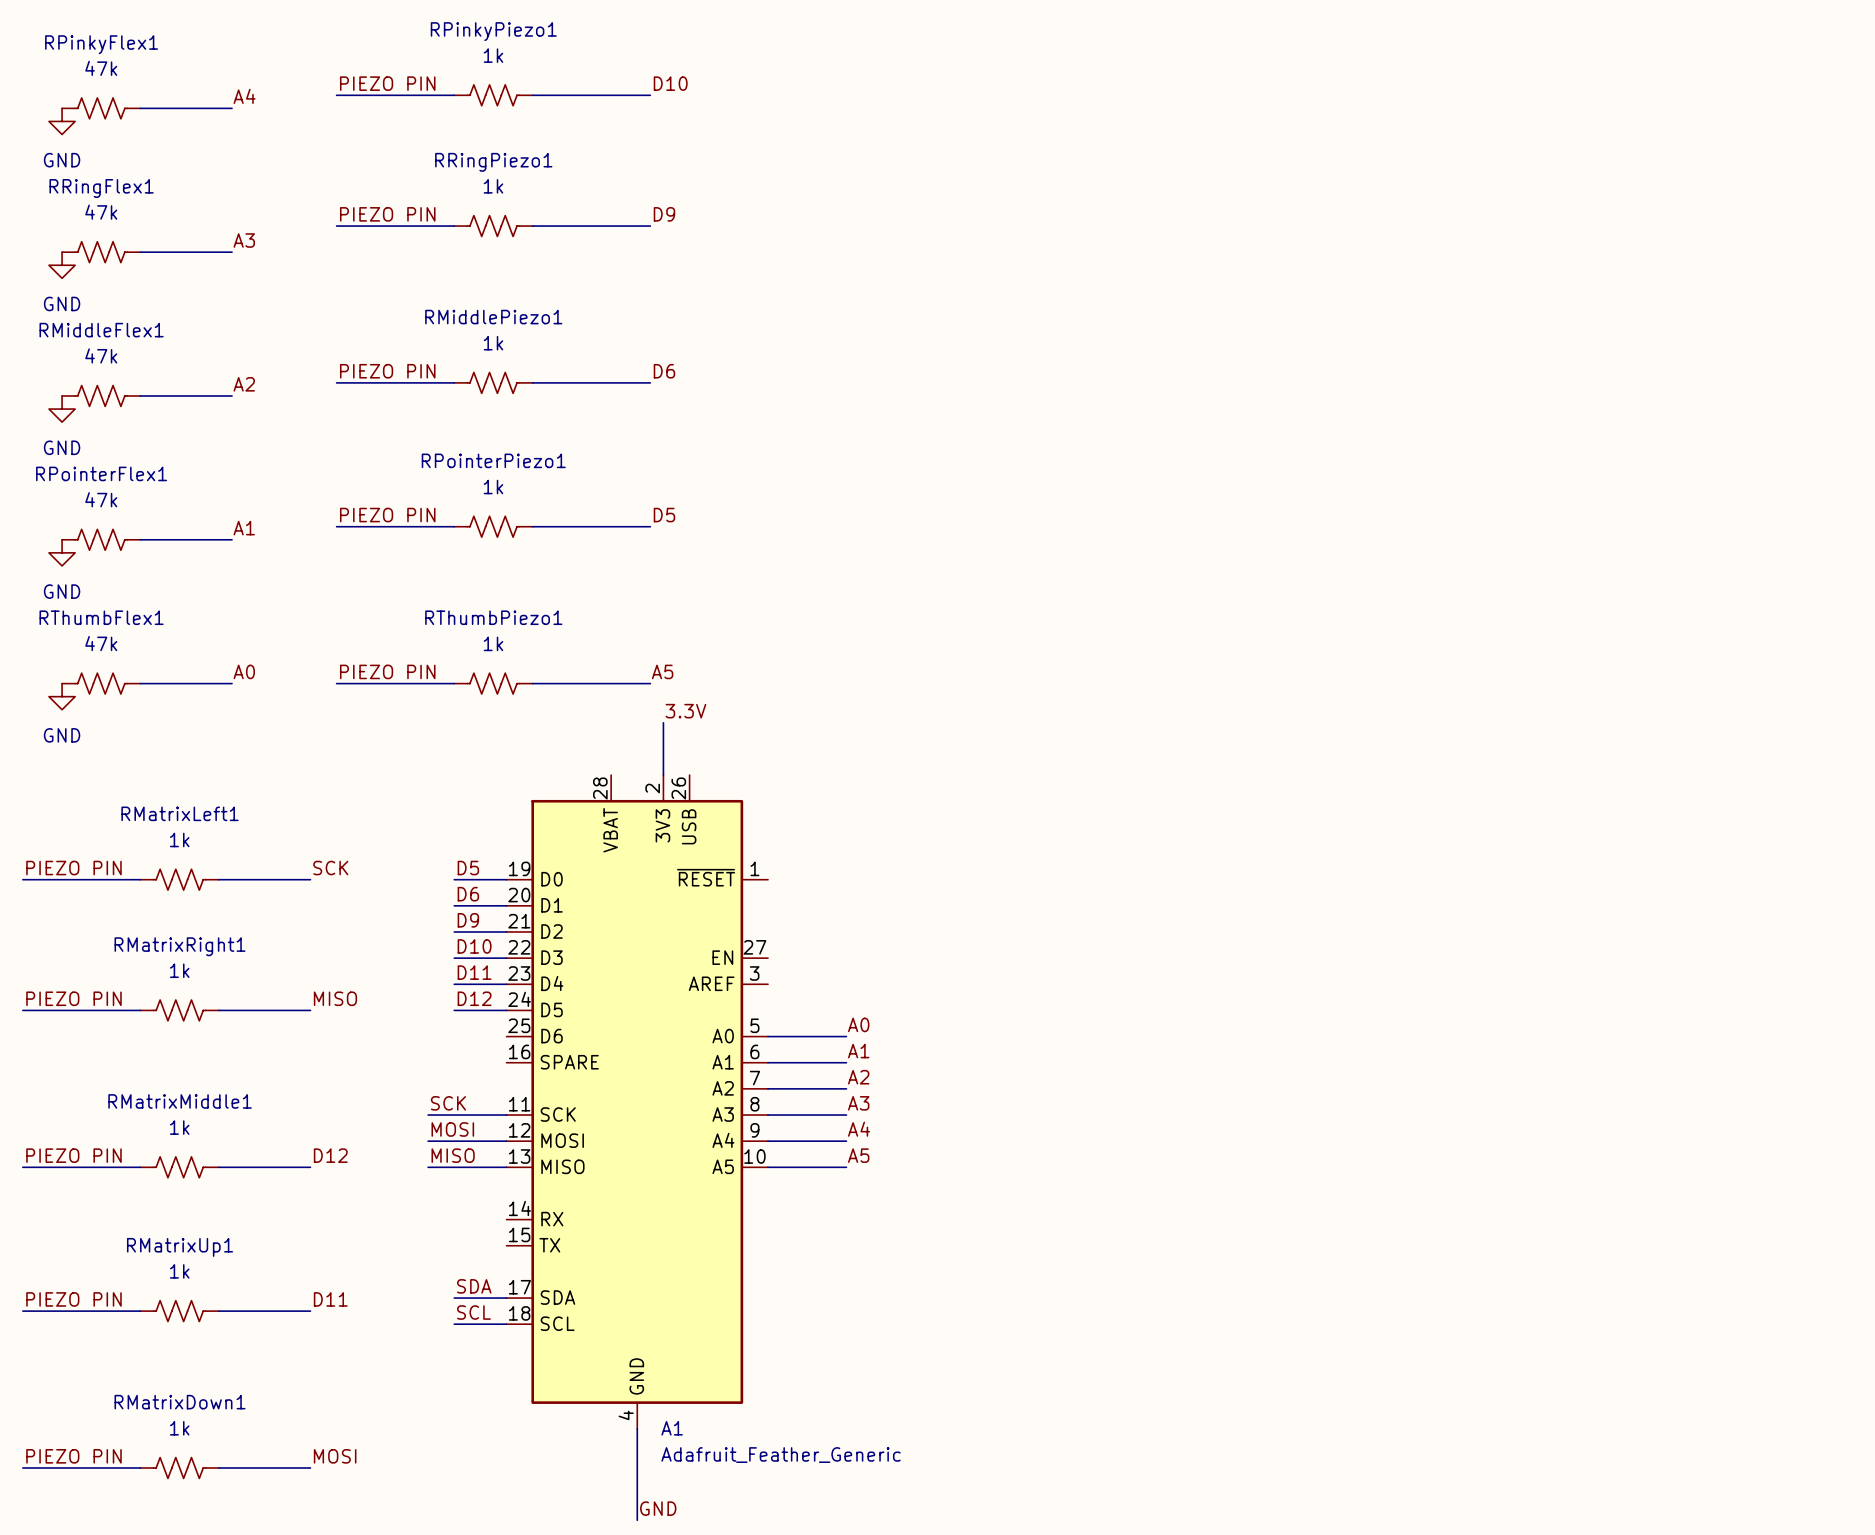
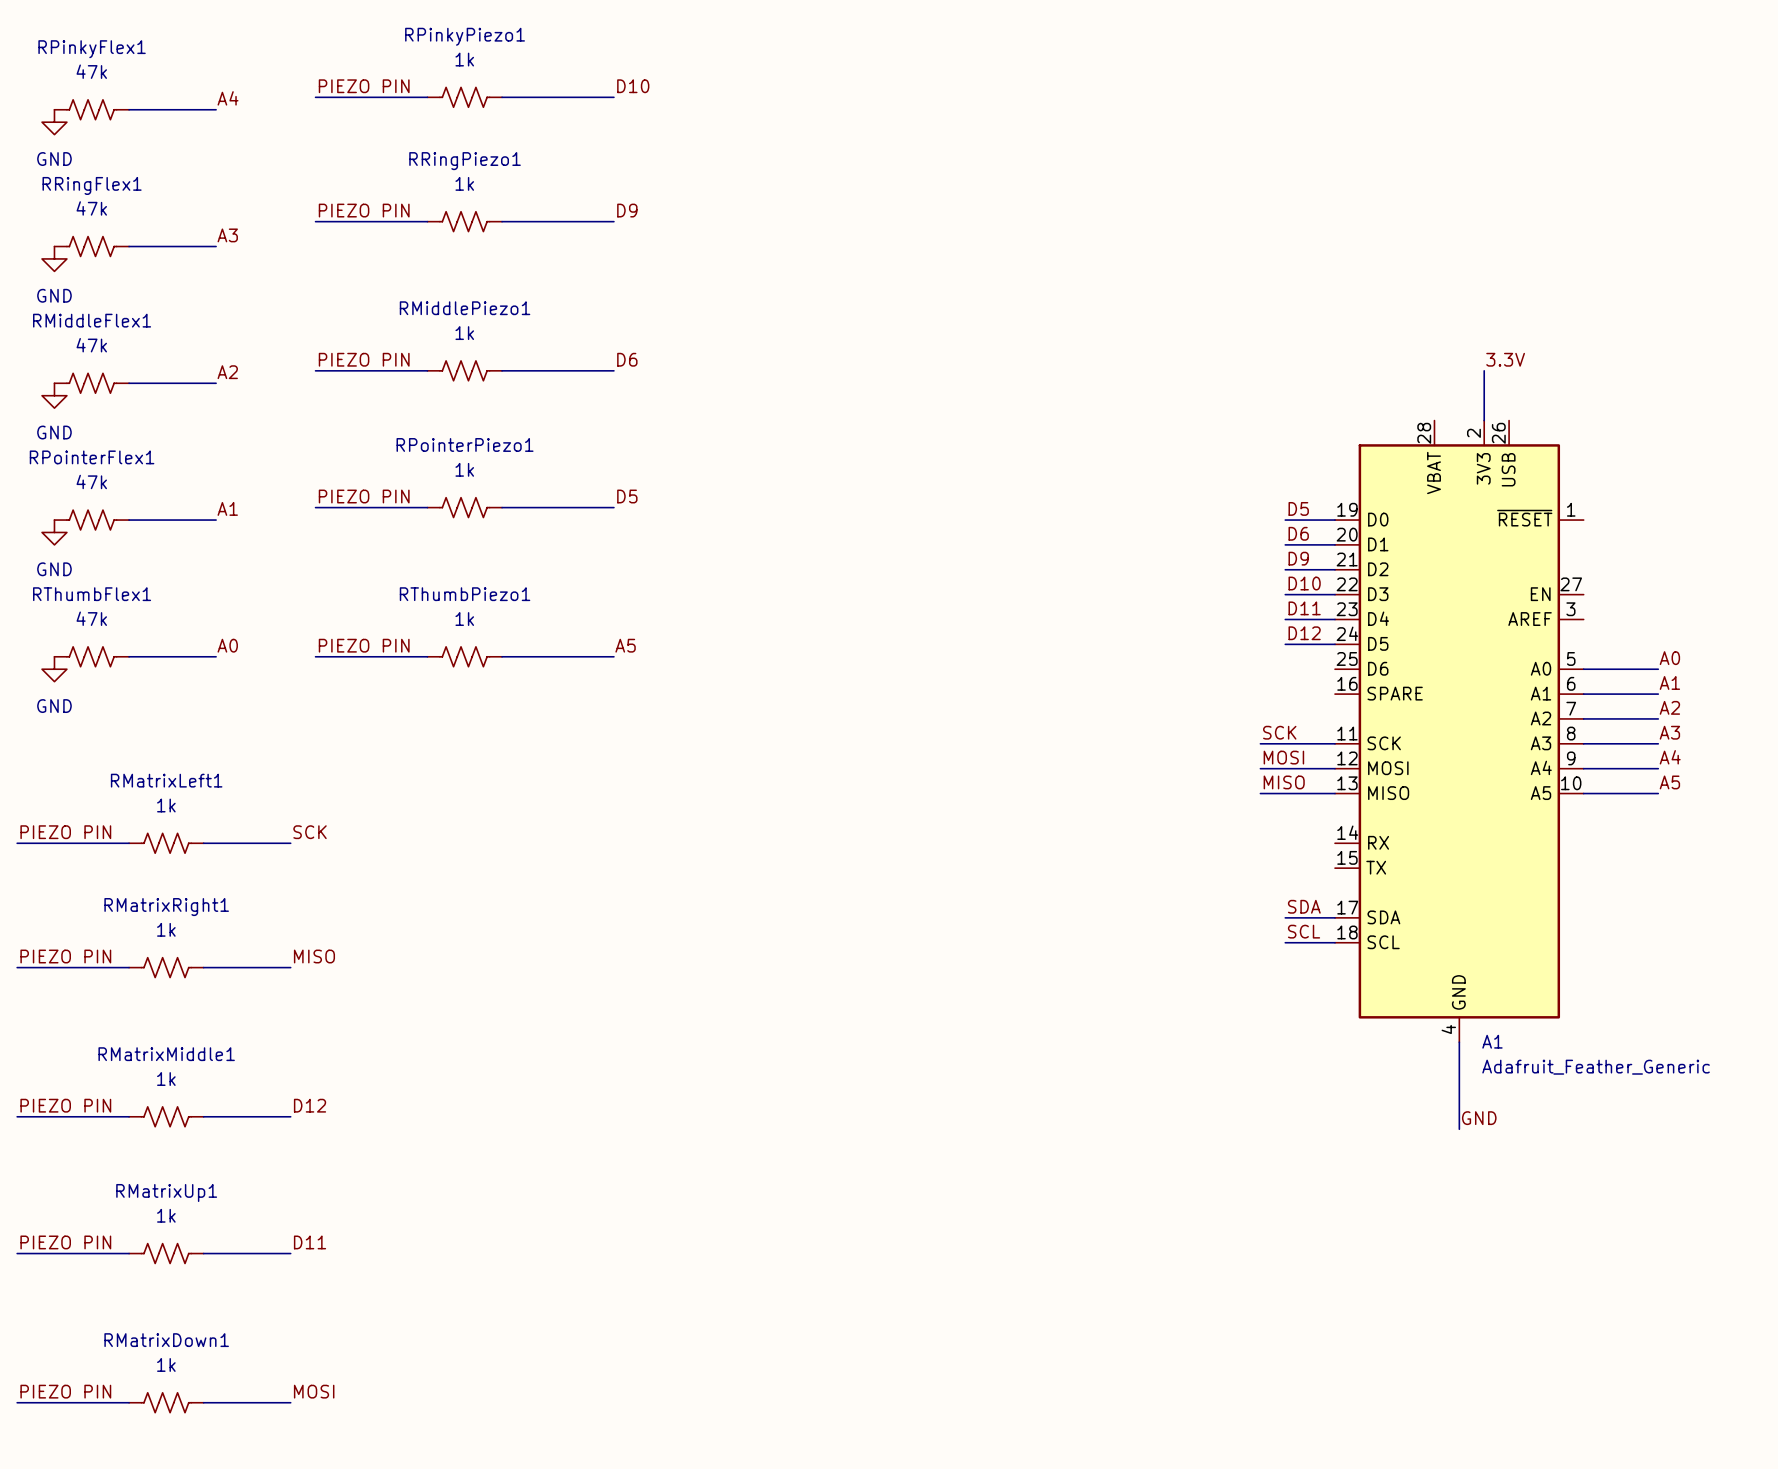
label: none -> 3.3V (1505, 359)
wire: none -> (1484, 370) (1484, 420)
label: none -> D5 (1298, 508)
wire: none -> (1285, 520) (1335, 520)
label: none -> D6 (1298, 533)
wire: none -> (1285, 544) (1335, 544)
label: none -> D9 (1298, 558)
wire: none -> (1285, 569) (1335, 569)
label: none -> D10 (1304, 583)
wire: none -> (1285, 594) (1335, 594)
label: none -> D11 (1304, 608)
wire: none -> (1285, 619) (1335, 619)
label: none -> D12 (1304, 633)
wire: none -> (1285, 644) (1335, 644)
label: none -> A0 (1669, 658)
wire: none -> (1583, 669) (1658, 669)
label: 3.3V (685, 711) -> none
label: none -> A1 (1669, 682)
wire: (663, 722) (663, 775) -> none
wire: none -> (1583, 694) (1658, 694)
label: none -> A2 (1669, 707)
wire: none -> (1583, 718) (1658, 718)
label: none -> SCK (1279, 732)
label: none -> A3 (1669, 732)
wire: none -> (1260, 743) (1335, 743)
wire: none -> (1583, 743) (1658, 743)
label: none -> MOSI (1283, 757)
label: none -> A4 (1670, 757)
wire: none -> (1260, 768) (1335, 768)
wire: none -> (1583, 768) (1658, 768)
label: none -> MISO (1284, 782)
label: none -> A5 (1669, 782)
wire: none -> (1260, 793) (1335, 793)
wire: none -> (1583, 793) (1658, 793)
label: D5 (468, 868) -> none
wire: (454, 879) (506, 879) -> none
label: D6 (468, 894) -> none
wire: (454, 905) (506, 905) -> none
label: D9 (468, 920) -> none
wire: (454, 931) (506, 931) -> none
label: D10 (474, 946) -> none
label: none -> SDA (1304, 906)
wire: (454, 958) (506, 958) -> none
wire: none -> (1285, 917) (1335, 917)
label: D11 (474, 972) -> none
label: none -> SCL (1304, 931)
wire: (454, 984) (506, 984) -> none
wire: none -> (1285, 942) (1335, 942)
label: D12 (474, 998) -> none
wire: (454, 1010) (506, 1010) -> none
label: A0 (858, 1024) -> none
wire: (768, 1036) (846, 1036) -> none
label: A1 (858, 1051) -> none
wire: (768, 1062) (846, 1062) -> none
label: A2 (858, 1077) -> none
wire: (768, 1088) (846, 1088) -> none
wire: none -> (1459, 1042) (1459, 1129)
A1 position: (637, 1101) -> (1459, 731)
label: SCK (448, 1103) -> none
label: A3 (858, 1103) -> none
wire: (428, 1115) (506, 1115) -> none
wire: (768, 1115) (846, 1115) -> none
label: MOSI (452, 1129) -> none
label: A4 (859, 1129) -> none
wire: (428, 1141) (506, 1141) -> none
wire: (768, 1141) (846, 1141) -> none
label: MISO (453, 1155) -> none
label: A5 (858, 1155) -> none
wire: (428, 1167) (506, 1167) -> none
wire: (768, 1167) (846, 1167) -> none
label: none -> GND (1479, 1118)
label: SDA (474, 1286) -> none
wire: (454, 1298) (506, 1298) -> none
label: SCL (473, 1312) -> none
wire: (454, 1324) (506, 1324) -> none
wire: (637, 1428) (637, 1520) -> none
label: GND (658, 1508) -> none

